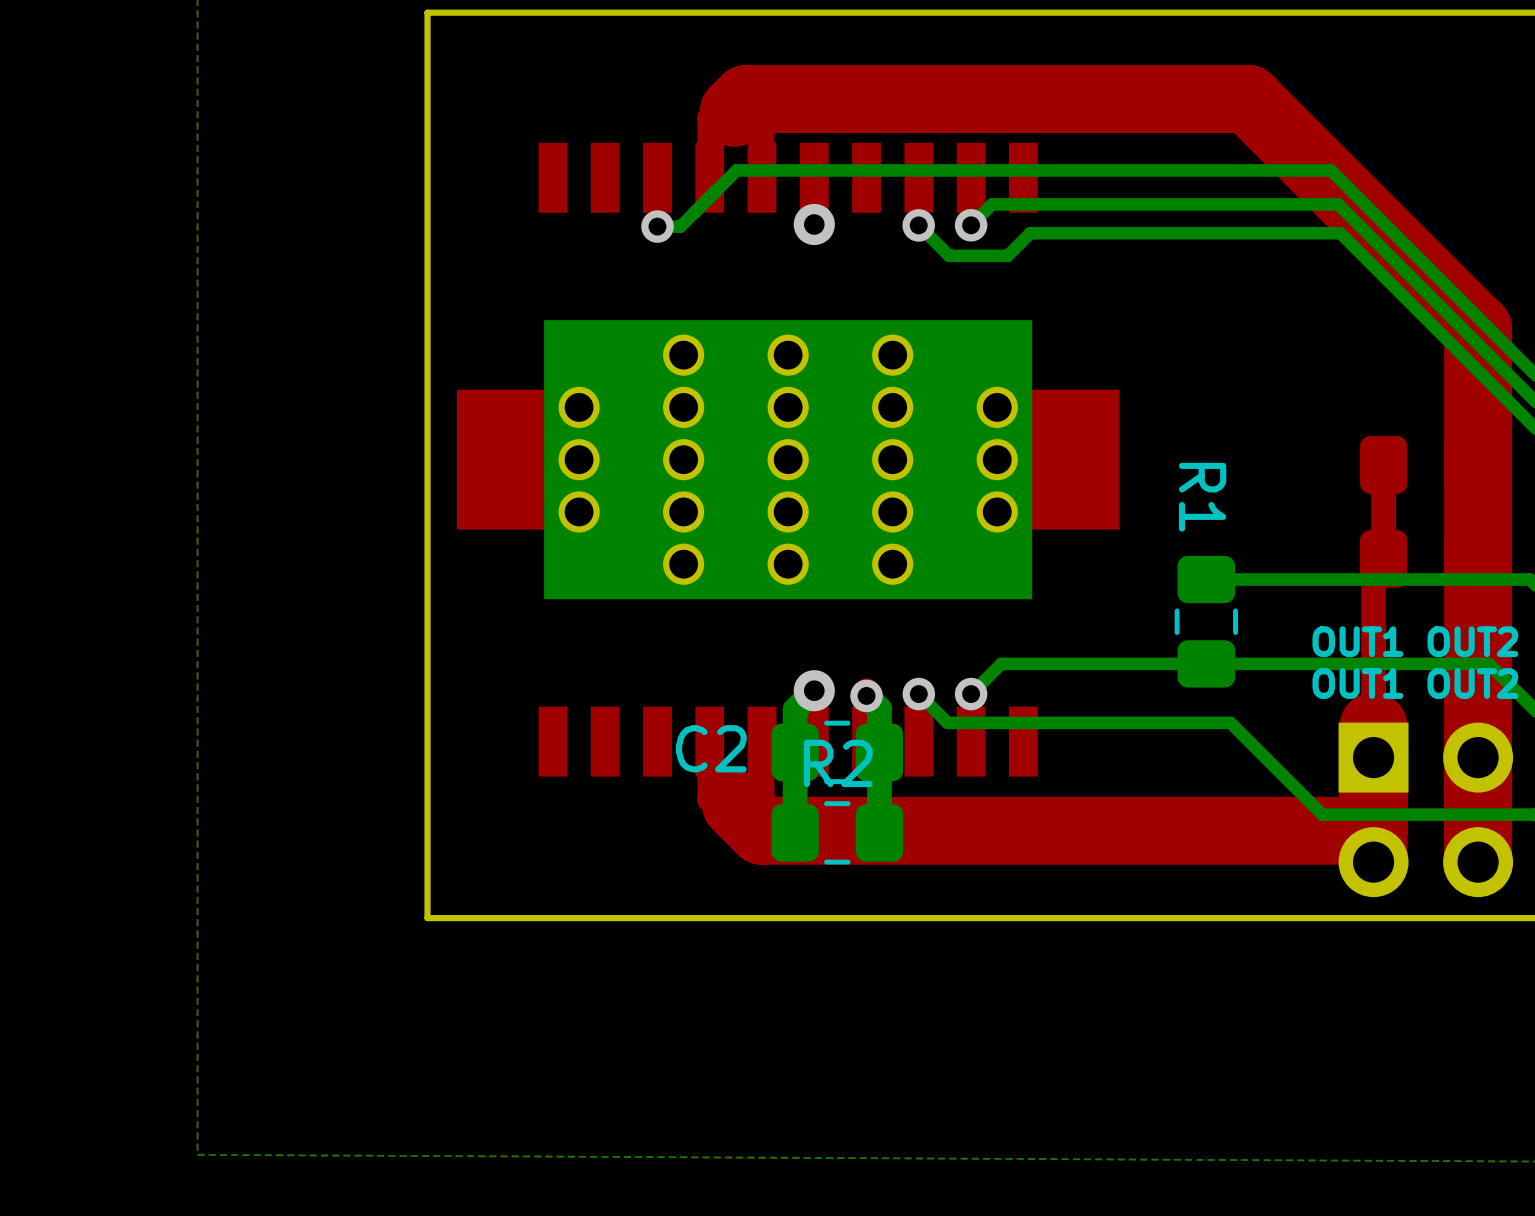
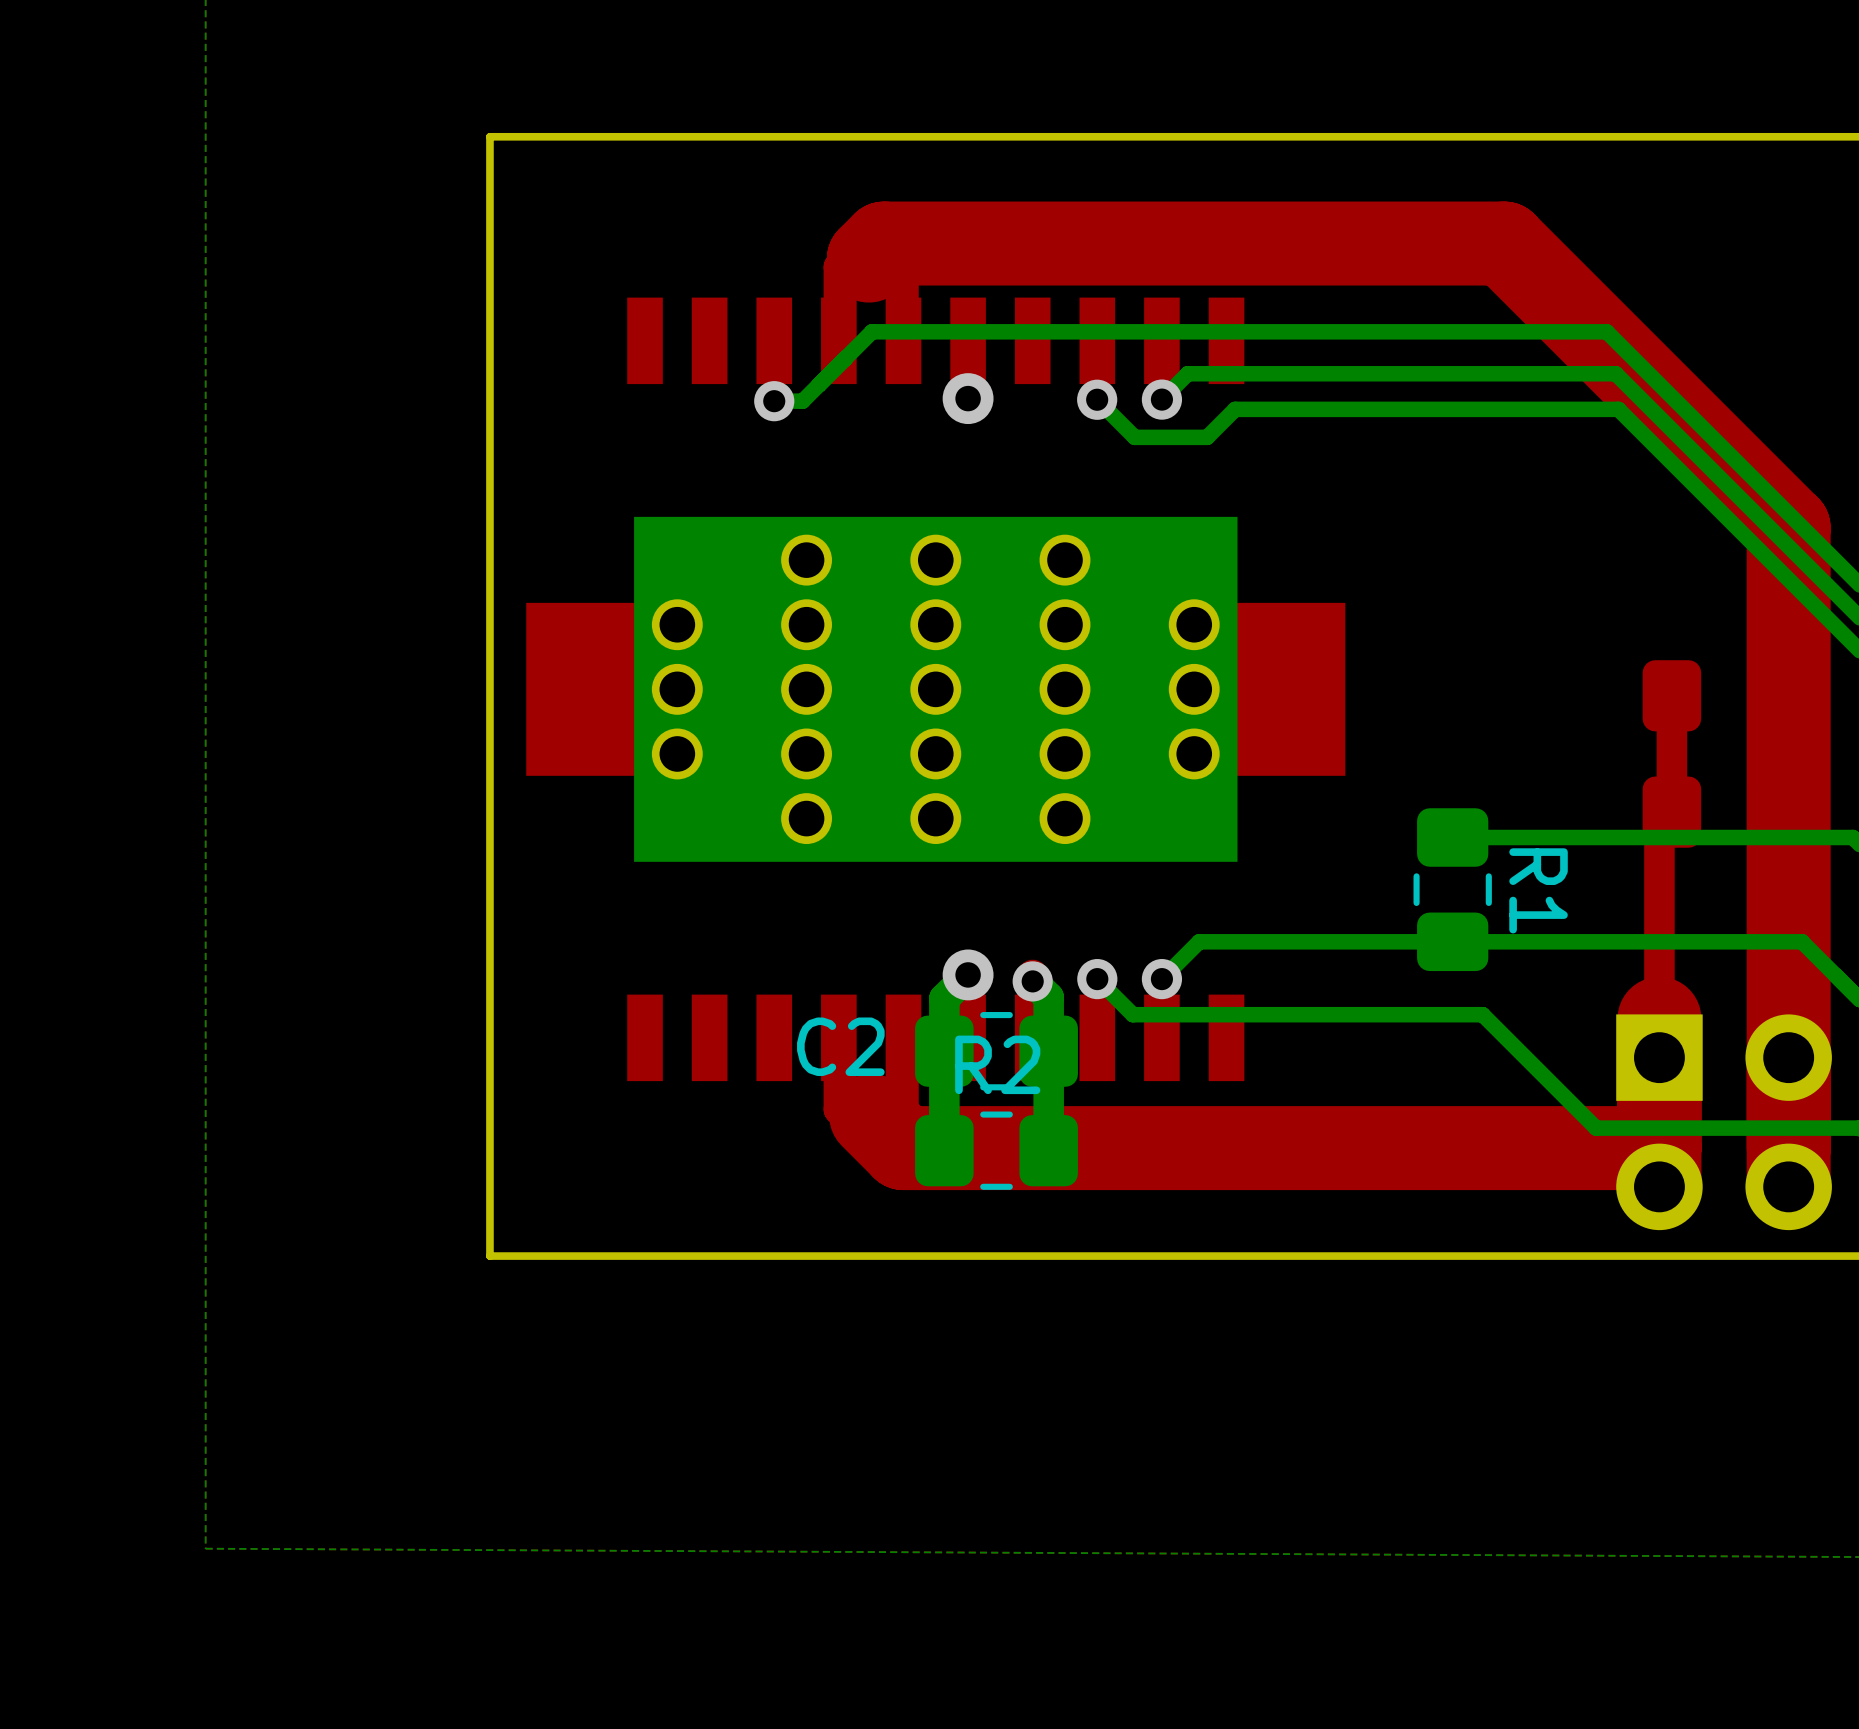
R1 name position: R1 (1202, 497) -> R1 (1538, 890)
text: OUT1 (1357, 641) -> none
text: OUT2 (1472, 641) -> none
text: OUT1 (1357, 683) -> none
text: OUT2 (1472, 683) -> none

